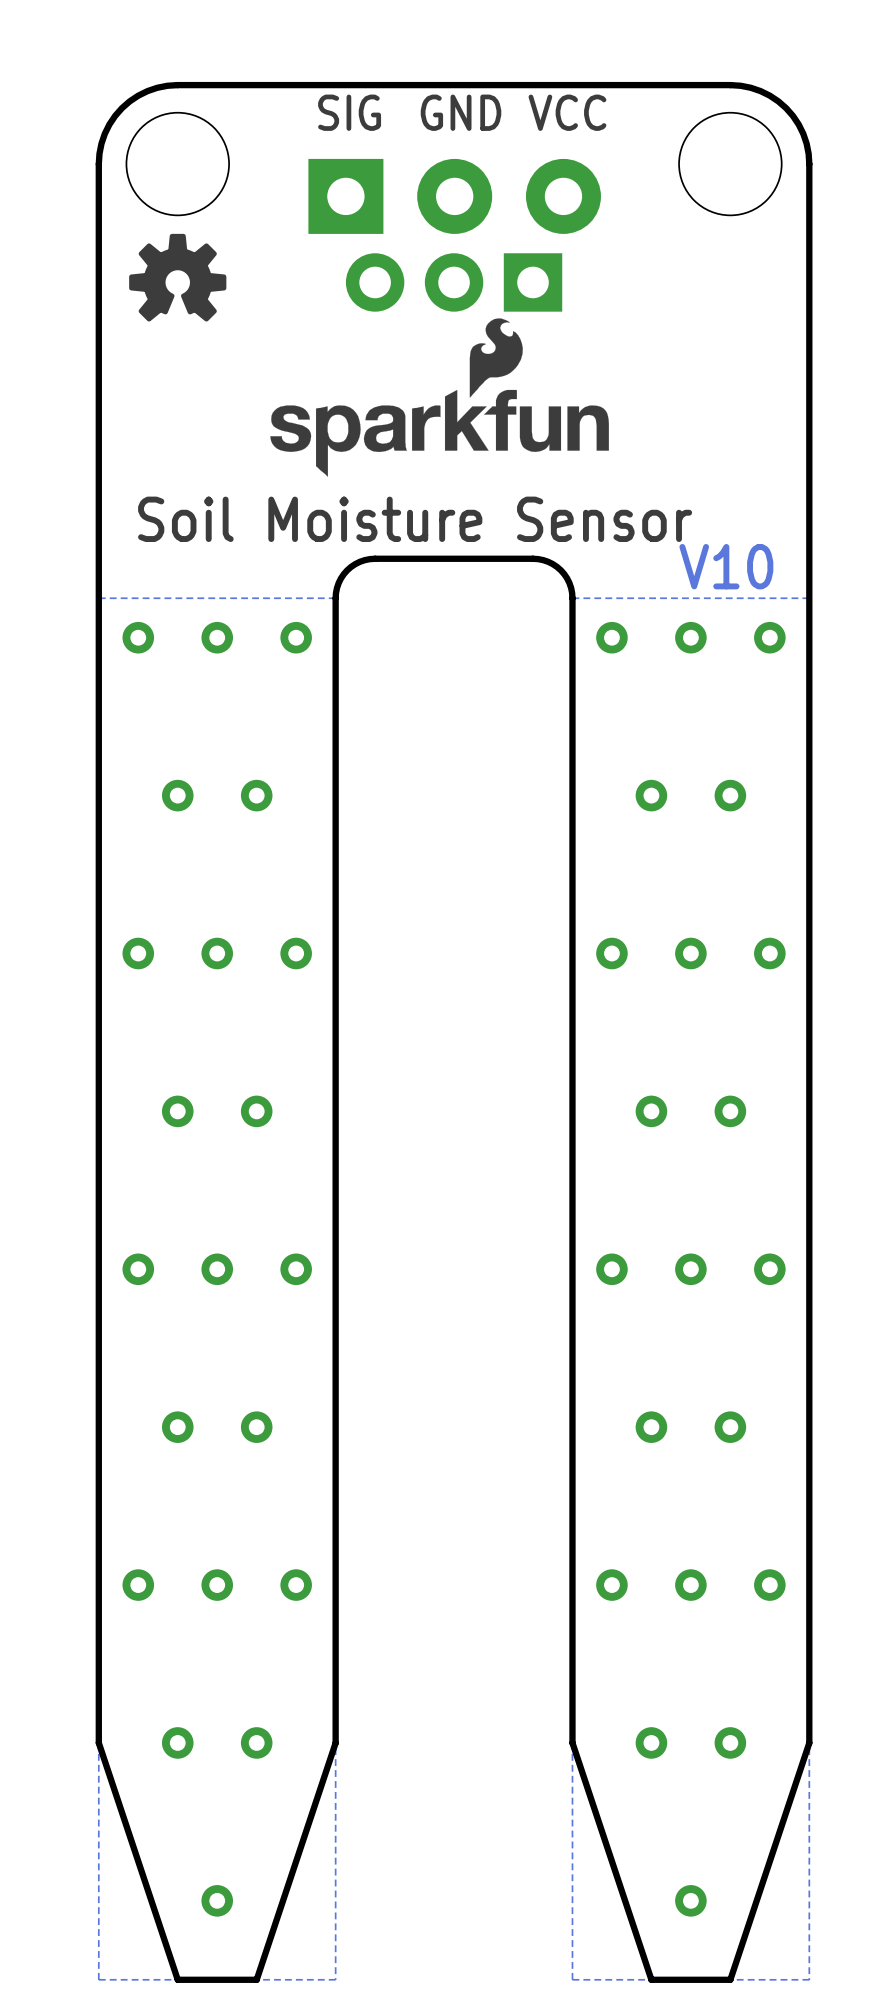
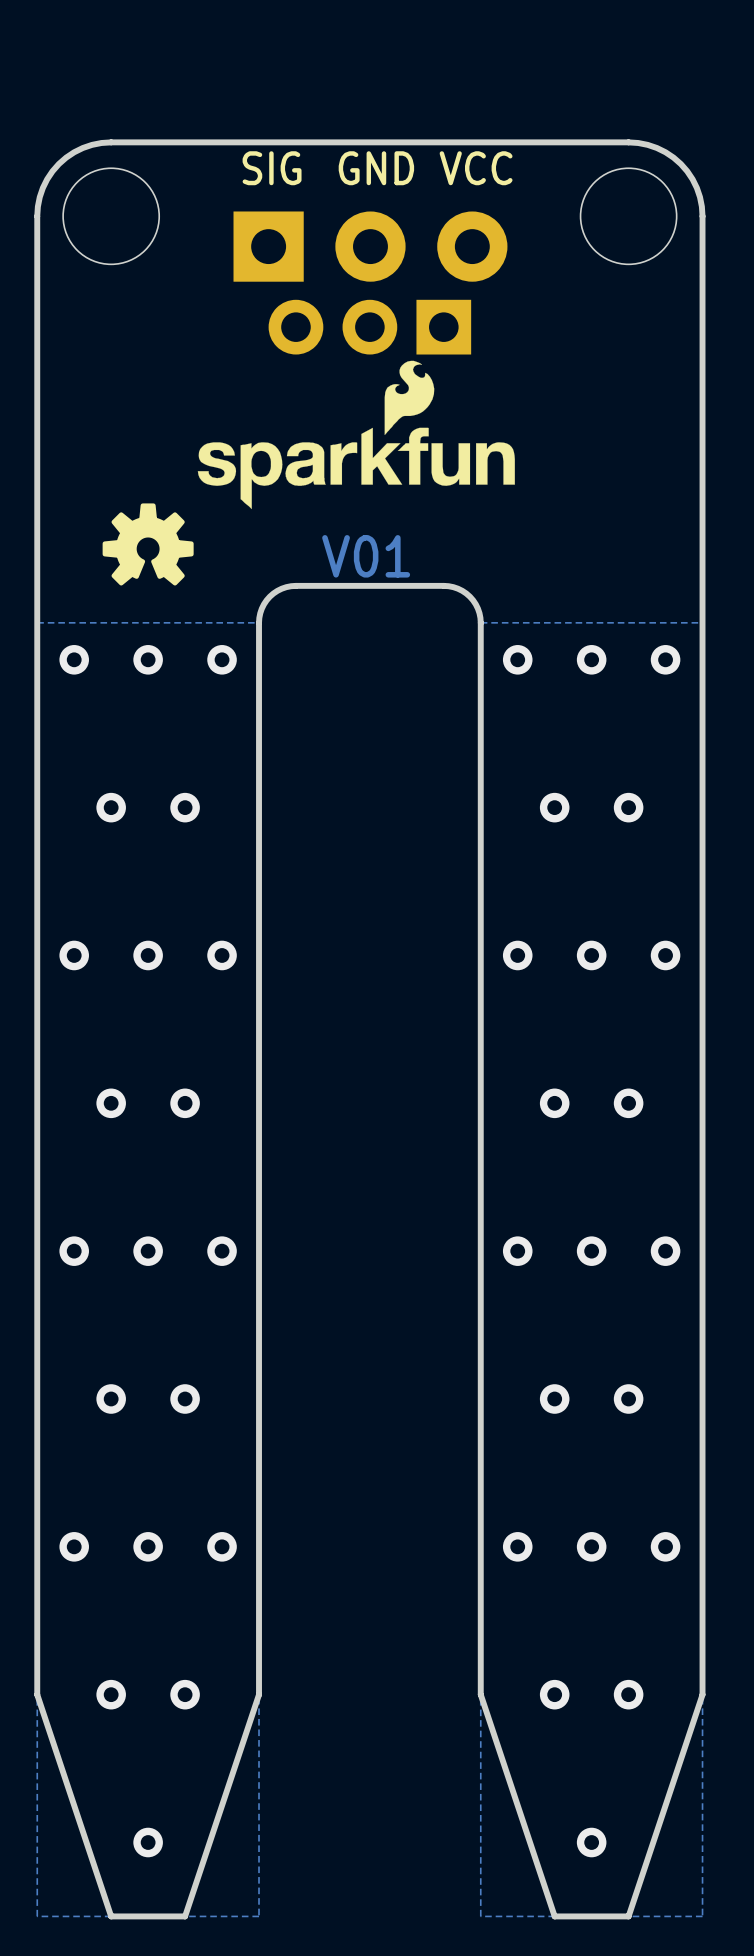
drawing position: (177, 277) -> (148, 544)
text: Soil Moisture Sensor (415, 519) -> none
text: none -> V01 (366, 556)
text: V10 (726, 566) -> none

